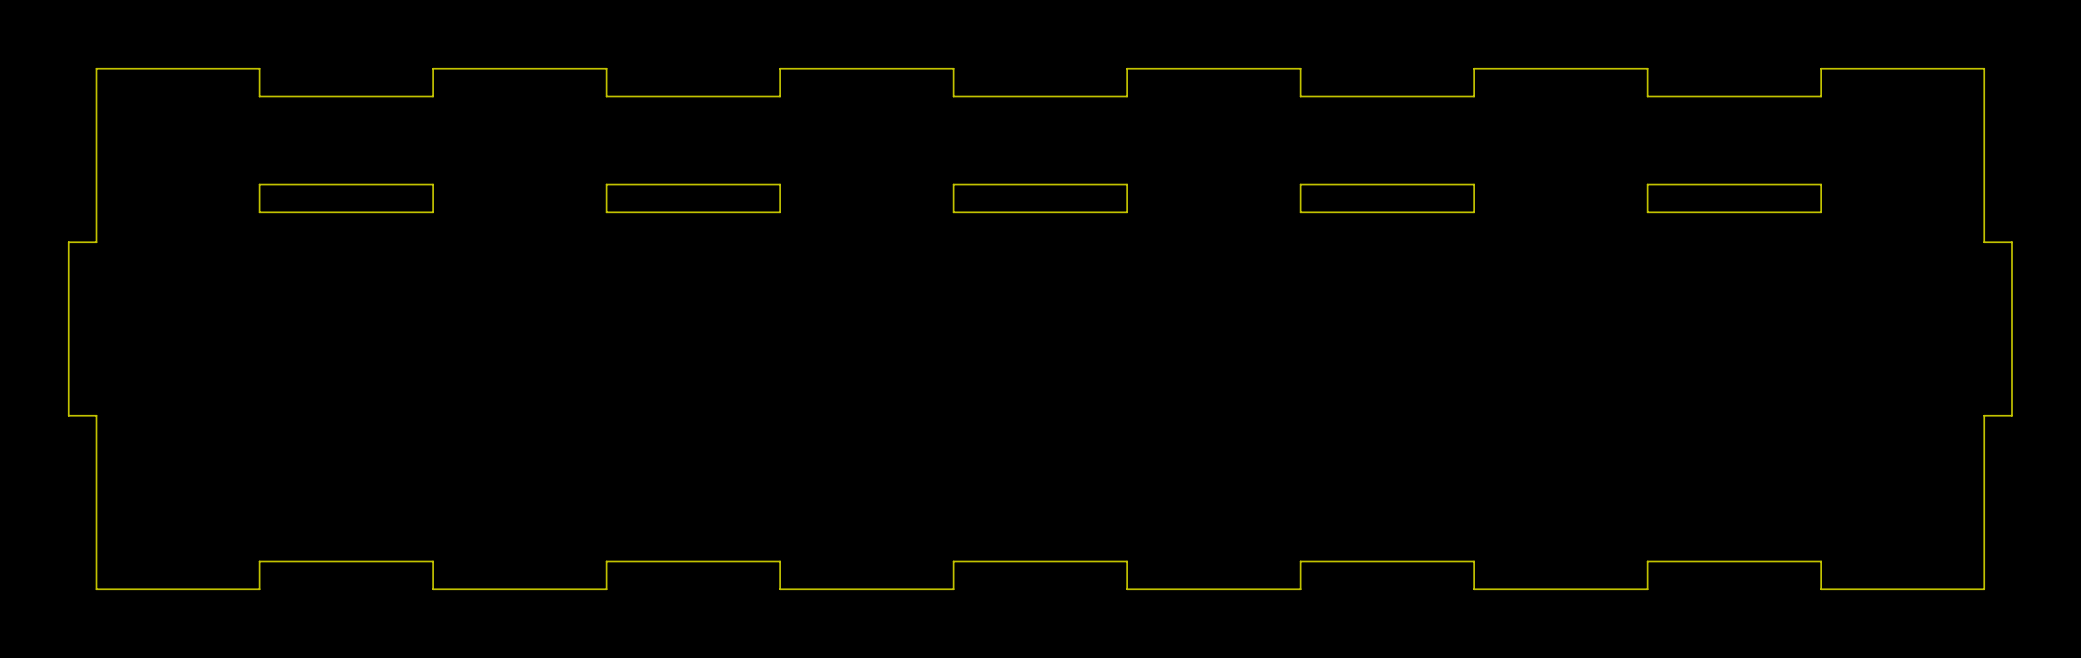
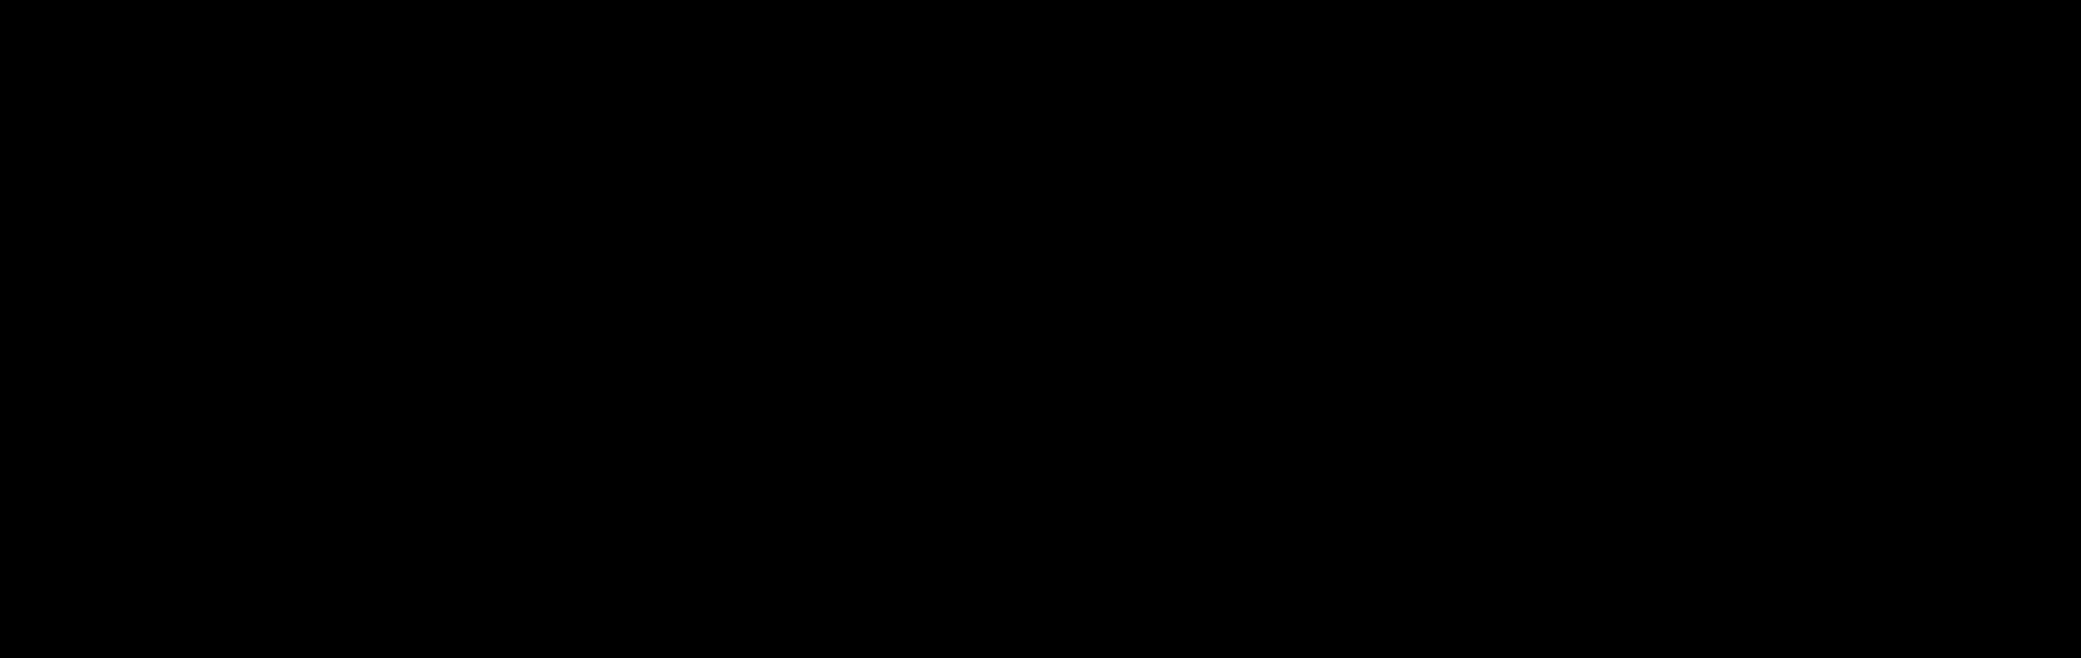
board edge: (1984, 68) (1984, 242) (2011, 242) (2011, 415) (1984, 415) (1984, 589) (1821, 589) (1821, 561) (1647, 561) (1647, 589) (1474, 589) (1474, 561) (1300, 561) (1300, 589) (1127, 589) (1127, 561) (953, 561) (953, 589) (780, 589) (780, 561) (606, 561) (606, 589) (433, 589) (433, 561) (259, 561) (259, 589) (96, 589) (96, 415) (68, 415) (68, 242) (96, 242) (96, 68) (259, 68) (259, 96) (433, 96) (433, 68) (606, 68) (606, 96) (780, 96) (780, 68) (953, 68) (953, 96) (1127, 96) (1127, 68) (1300, 68) (1300, 96) (1474, 96) (1474, 68) (1647, 68) (1647, 96) (1821, 96) (1821, 68) (1984, 68) -> none
board edge: (433, 184) (259, 184) (259, 212) (433, 212) (433, 184) -> none
board edge: (780, 184) (606, 184) (606, 212) (780, 212) (780, 184) -> none
board edge: (1127, 184) (953, 184) (953, 212) (1127, 212) (1127, 184) -> none
board edge: (1474, 184) (1300, 184) (1300, 212) (1474, 212) (1474, 184) -> none
board edge: (1821, 184) (1647, 184) (1647, 212) (1821, 212) (1821, 184) -> none

